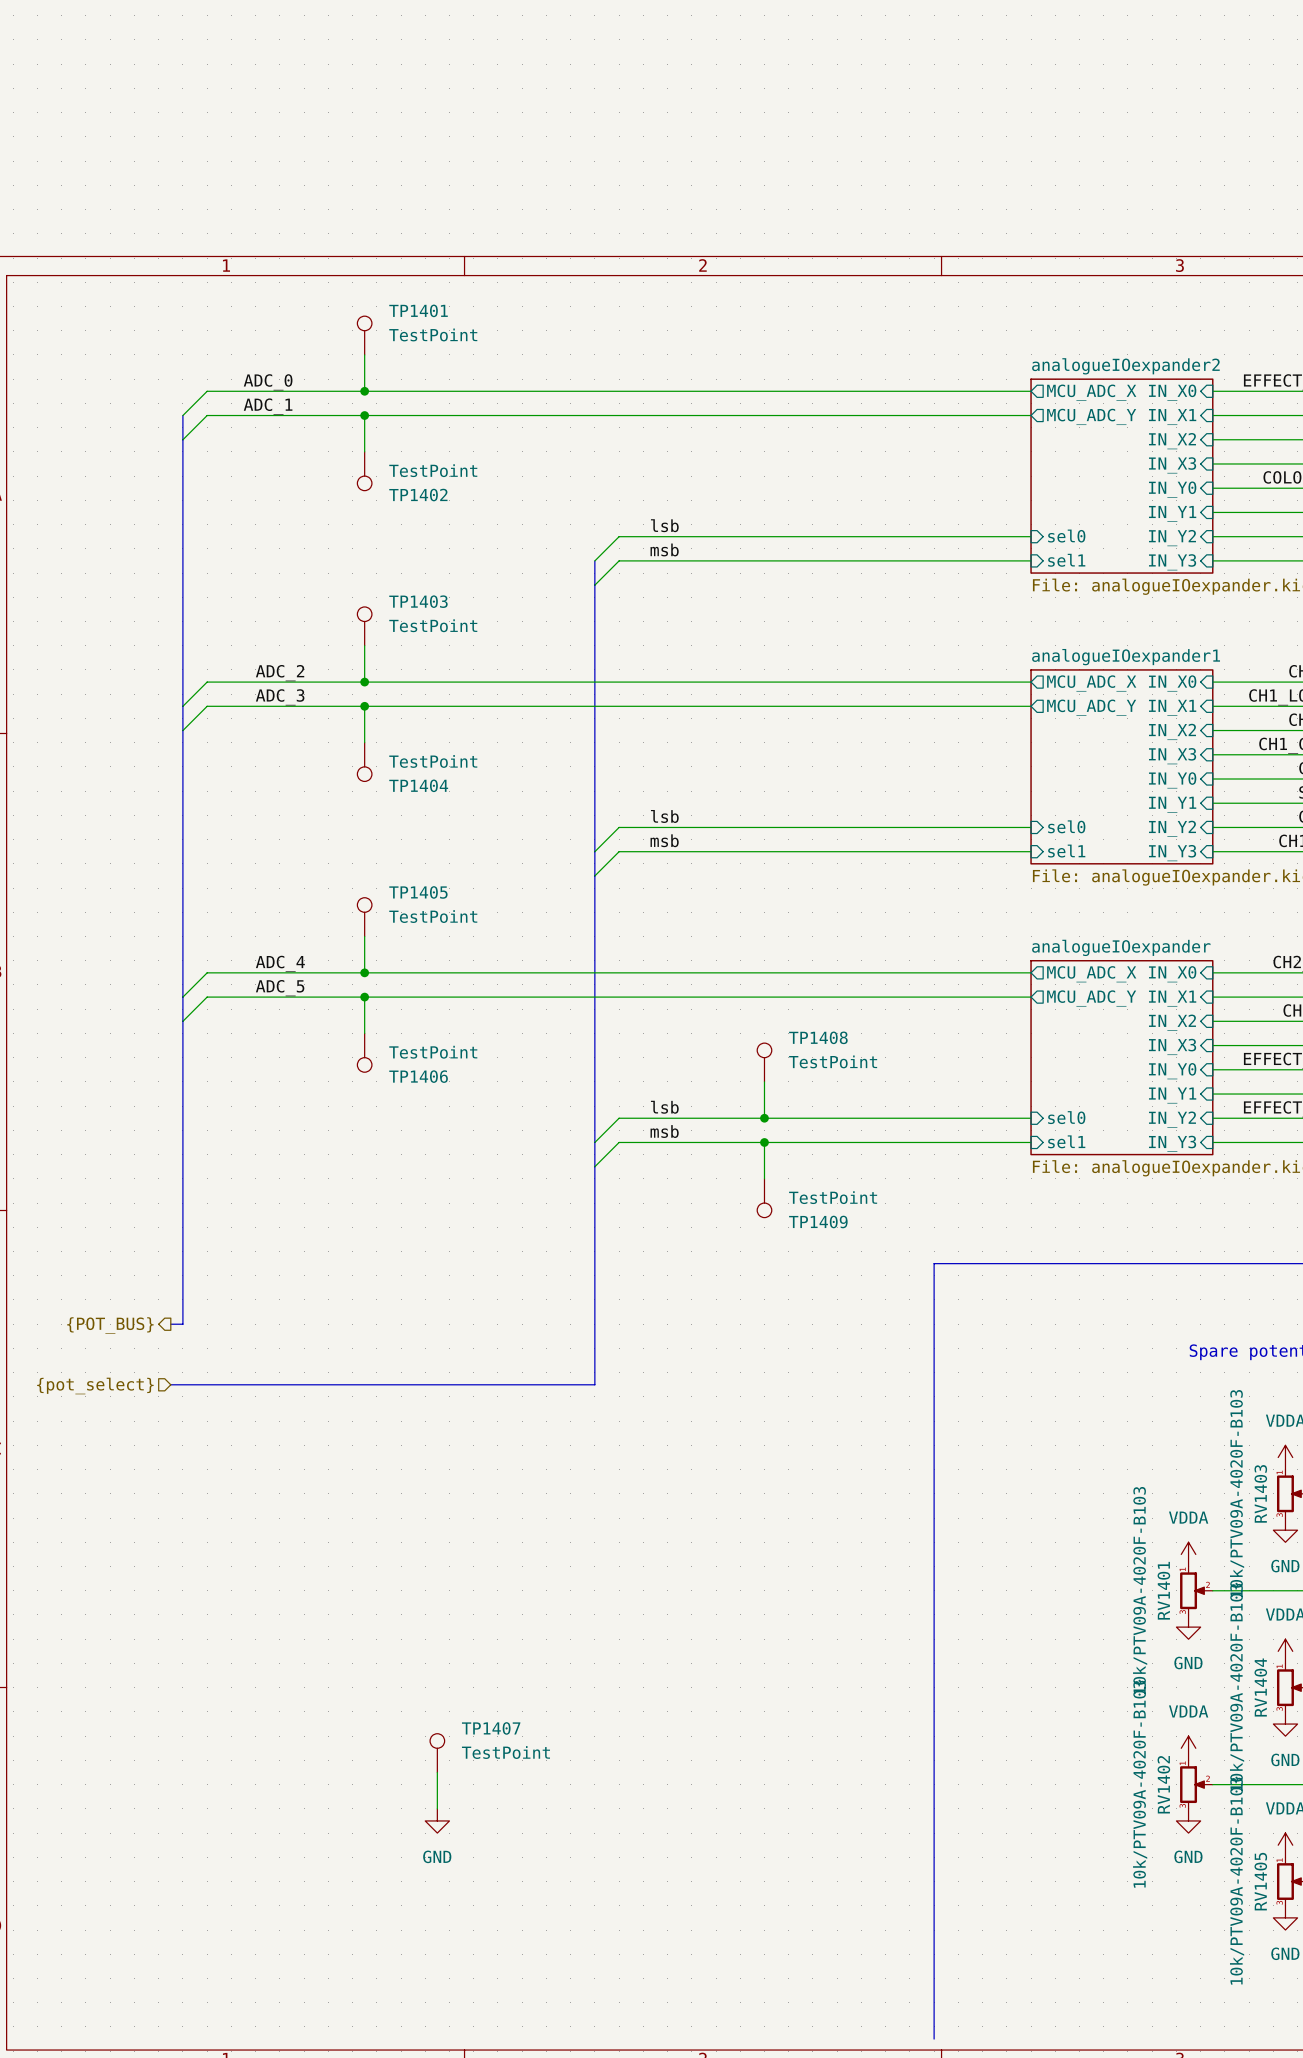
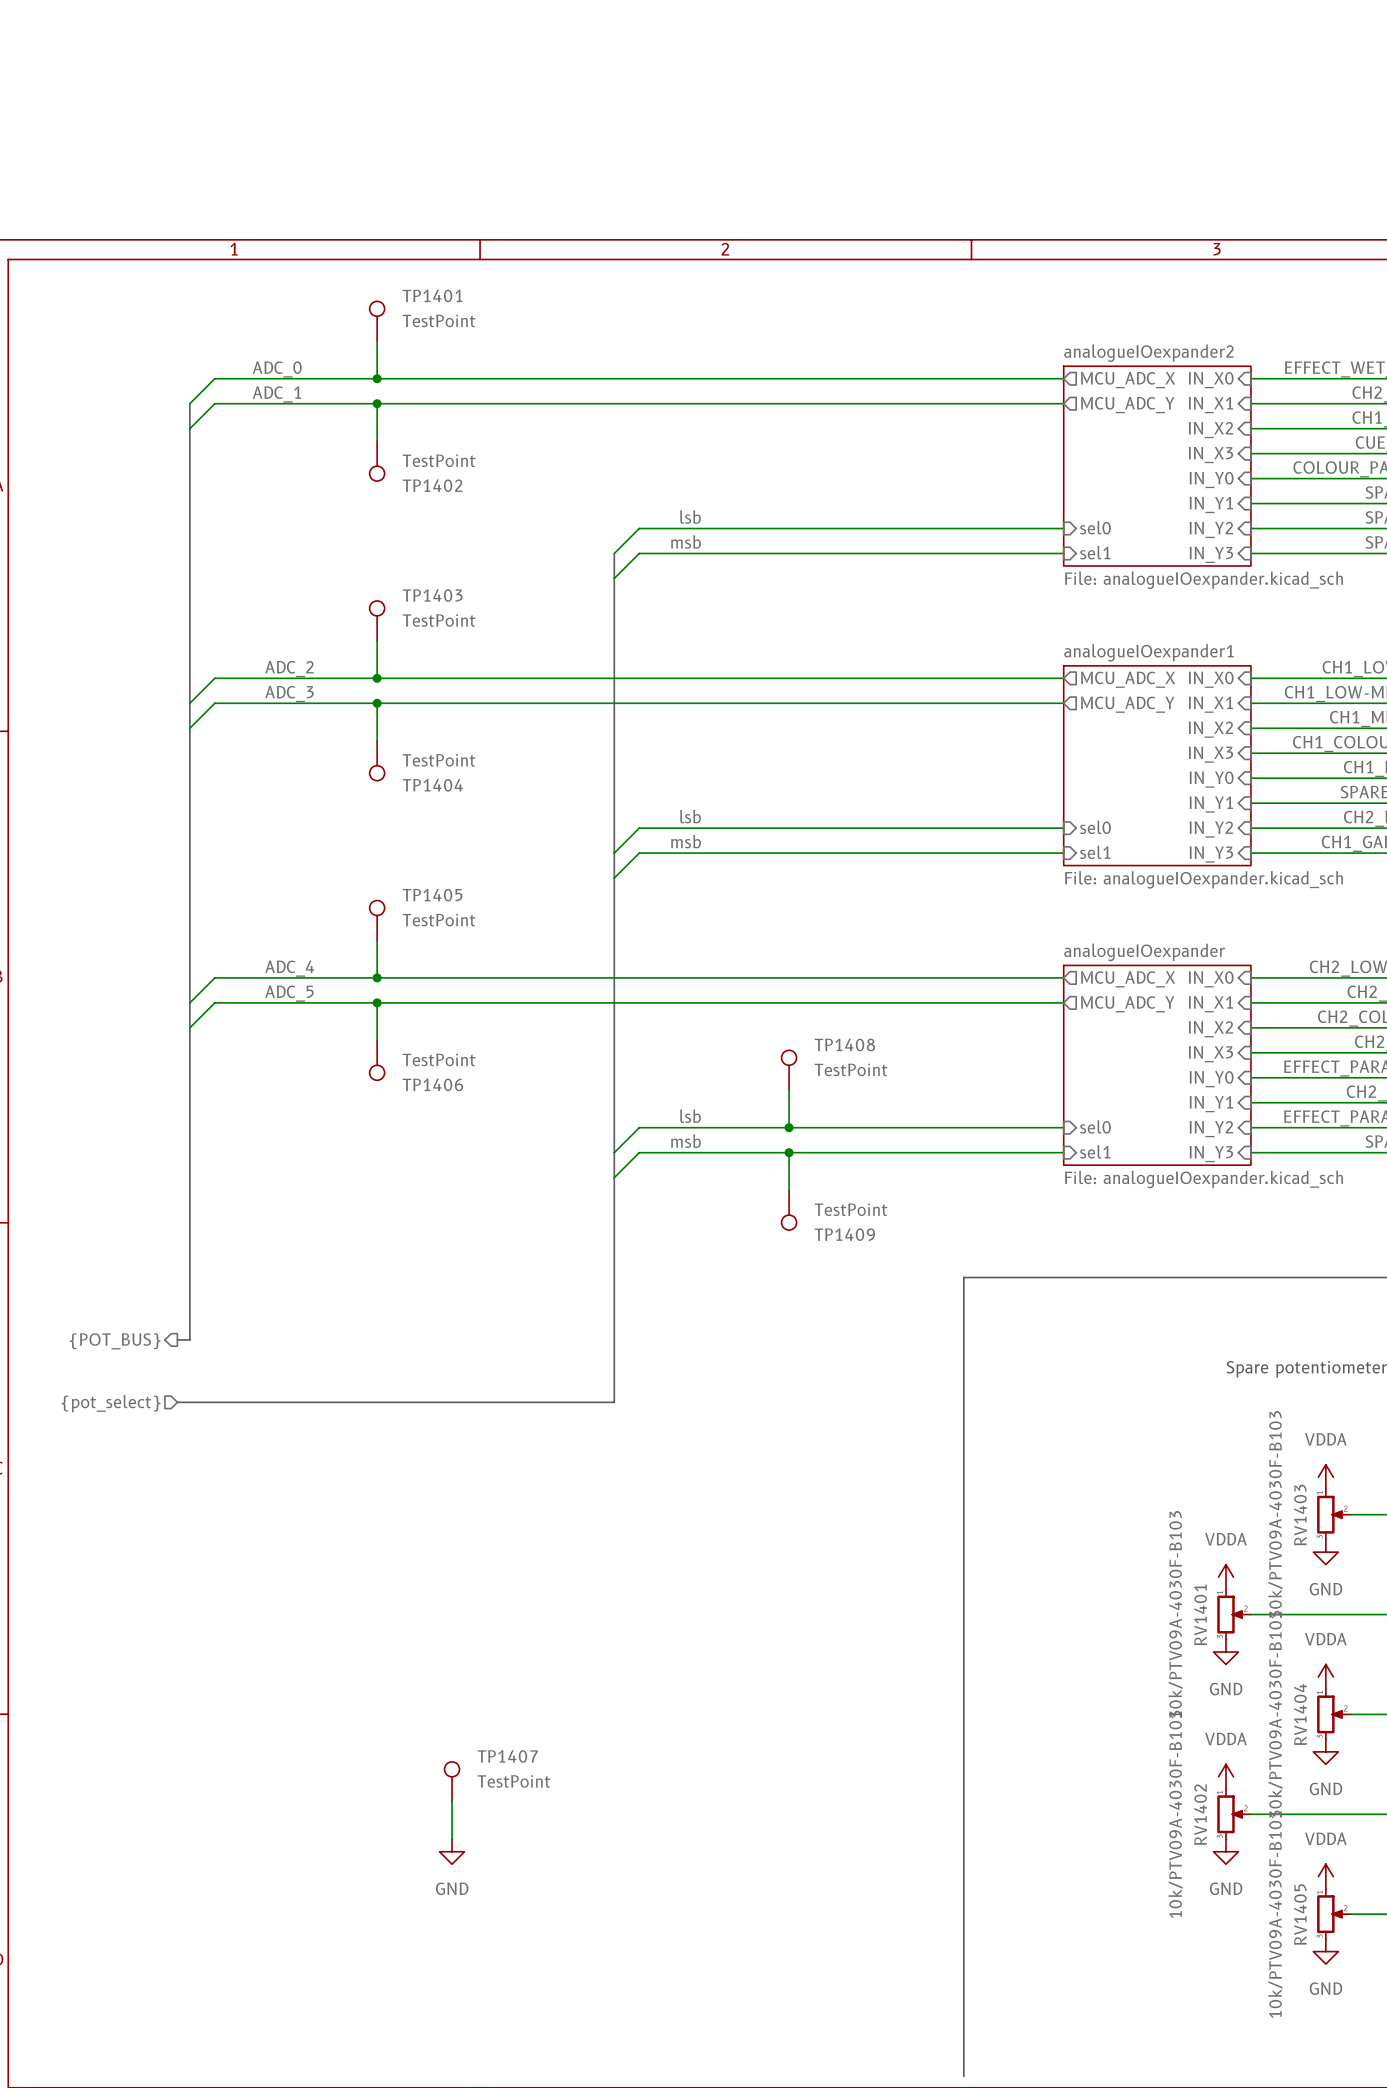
RV1403 value: 10k/PTV09A-4020F-B103 (1237, 1493) -> 10k/PTV09A-4030F-B103 (1275, 1514)
RV1401 value: 10k/PTV09A-4020F-B103 (1140, 1590) -> 10k/PTV09A-4030F-B103 (1175, 1614)
RV1404 value: 10k/PTV09A-4020F-B103 (1237, 1687) -> 10k/PTV09A-4030F-B103 (1275, 1714)
RV1402 value: 10k/PTV09A-4020F-B103 (1140, 1784) -> 10k/PTV09A-4030F-B103 (1175, 1814)
RV1405 value: 10k/PTV09A-4020F-B103 (1237, 1881) -> 10k/PTV09A-4030F-B103 (1275, 1914)

